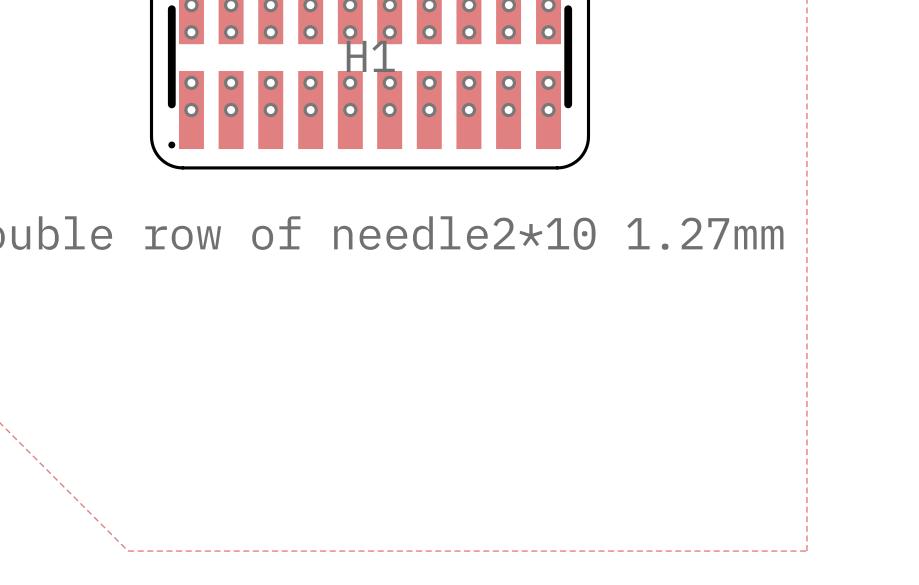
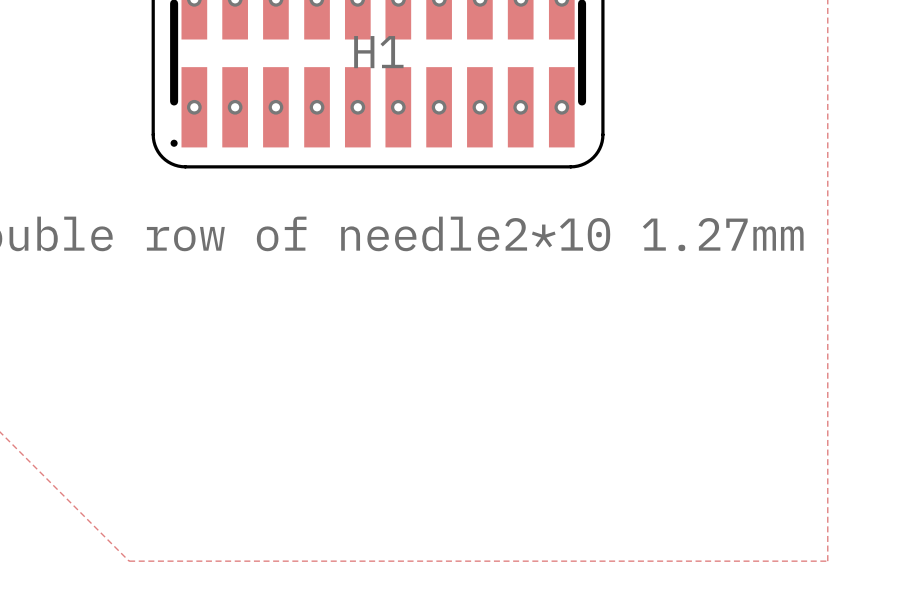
via: (191, 32) -> none
via: (231, 32) -> none
via: (270, 32) -> none
via: (310, 32) -> none
via: (350, 32) -> none
via: (389, 32) -> none
via: (429, 32) -> none
via: (469, 32) -> none
via: (508, 32) -> none
via: (548, 32) -> none
via: (191, 82) -> none
via: (231, 82) -> none
via: (270, 82) -> none
via: (310, 82) -> none
via: (350, 82) -> none
via: (389, 82) -> none
via: (429, 82) -> none
via: (469, 82) -> none
via: (508, 82) -> none
via: (548, 82) -> none

